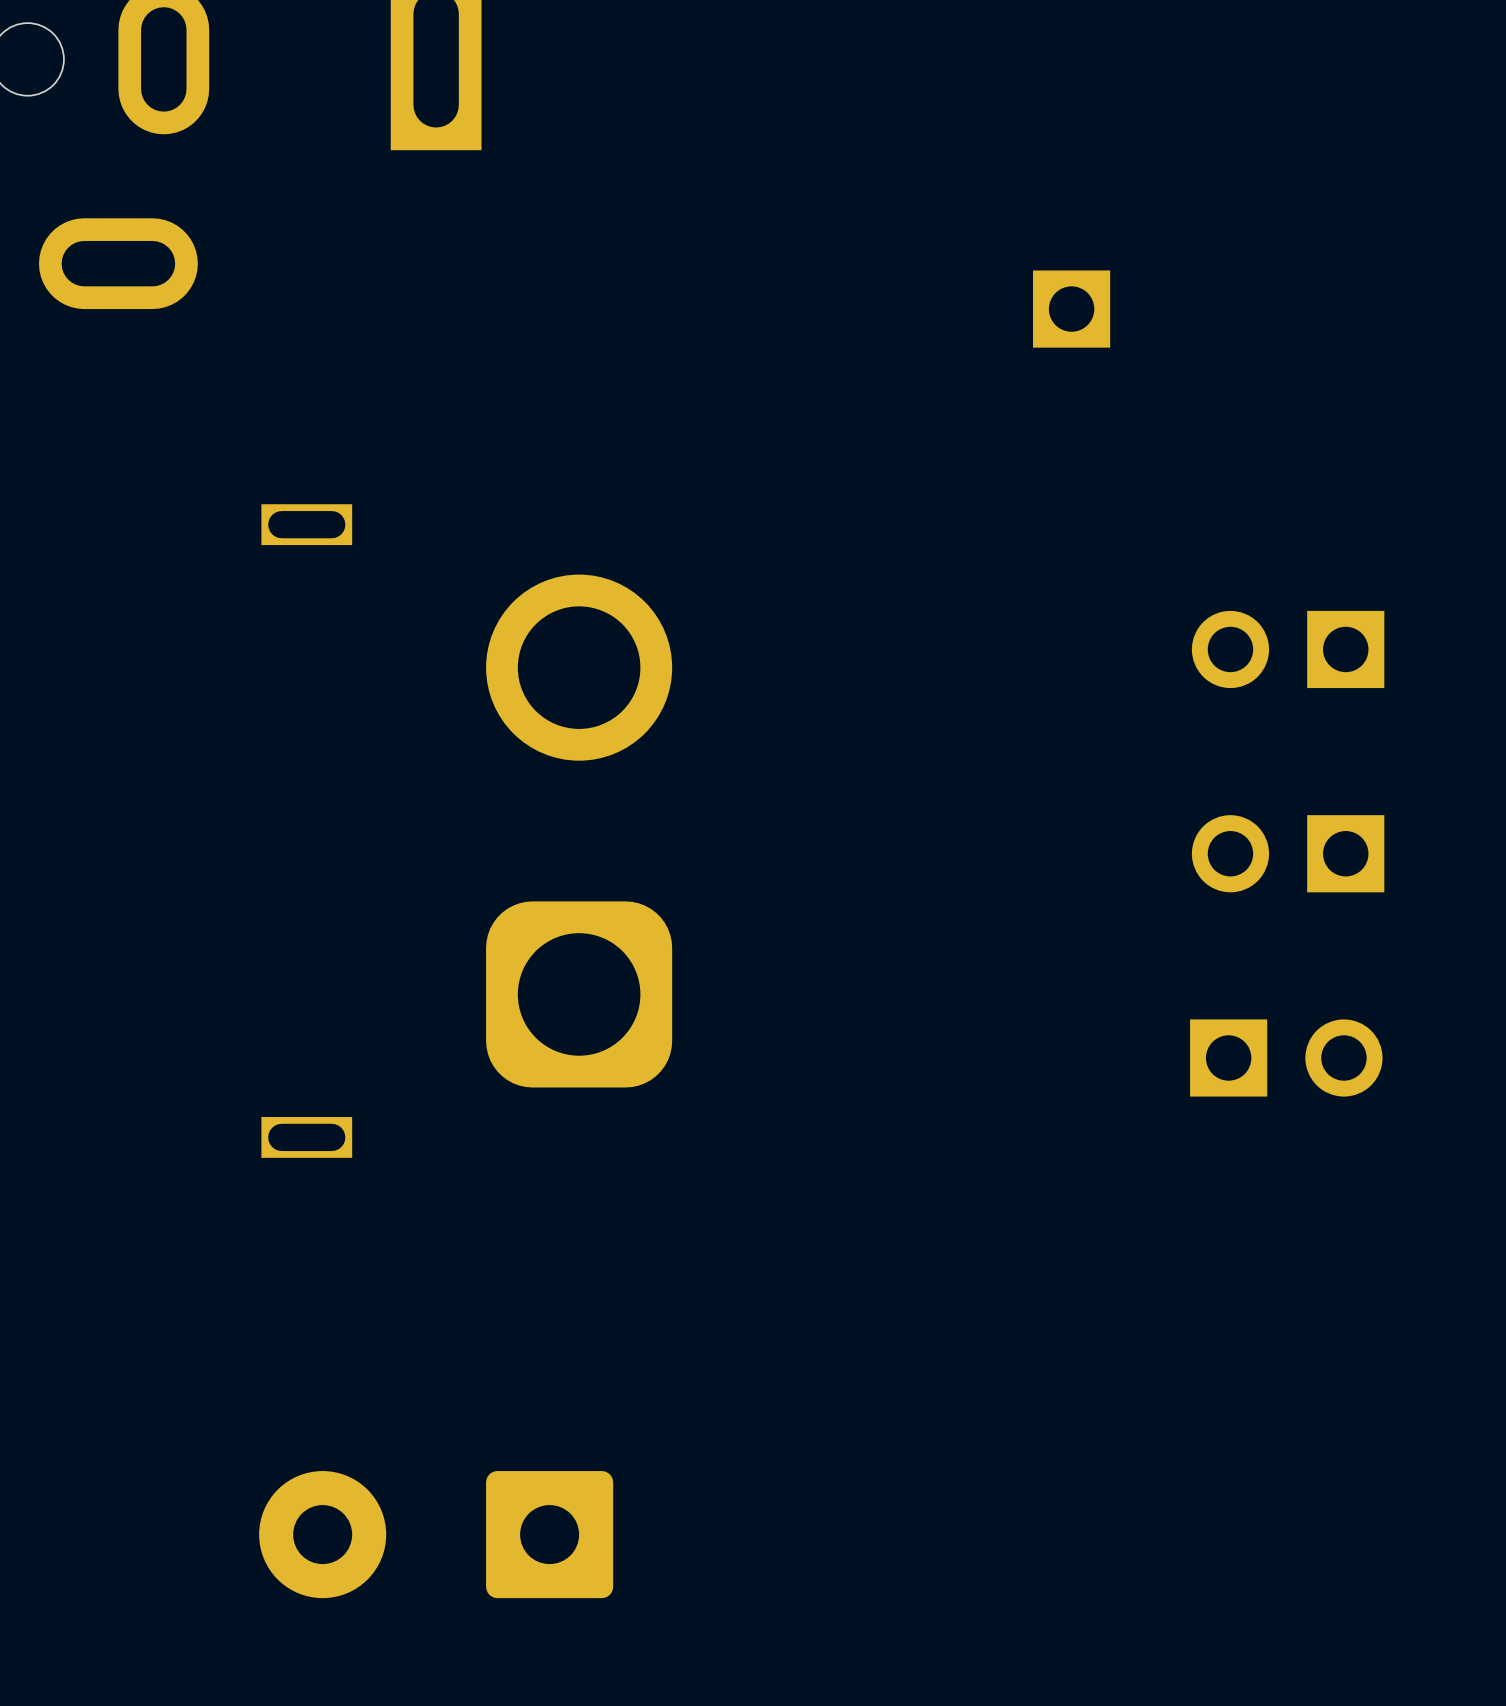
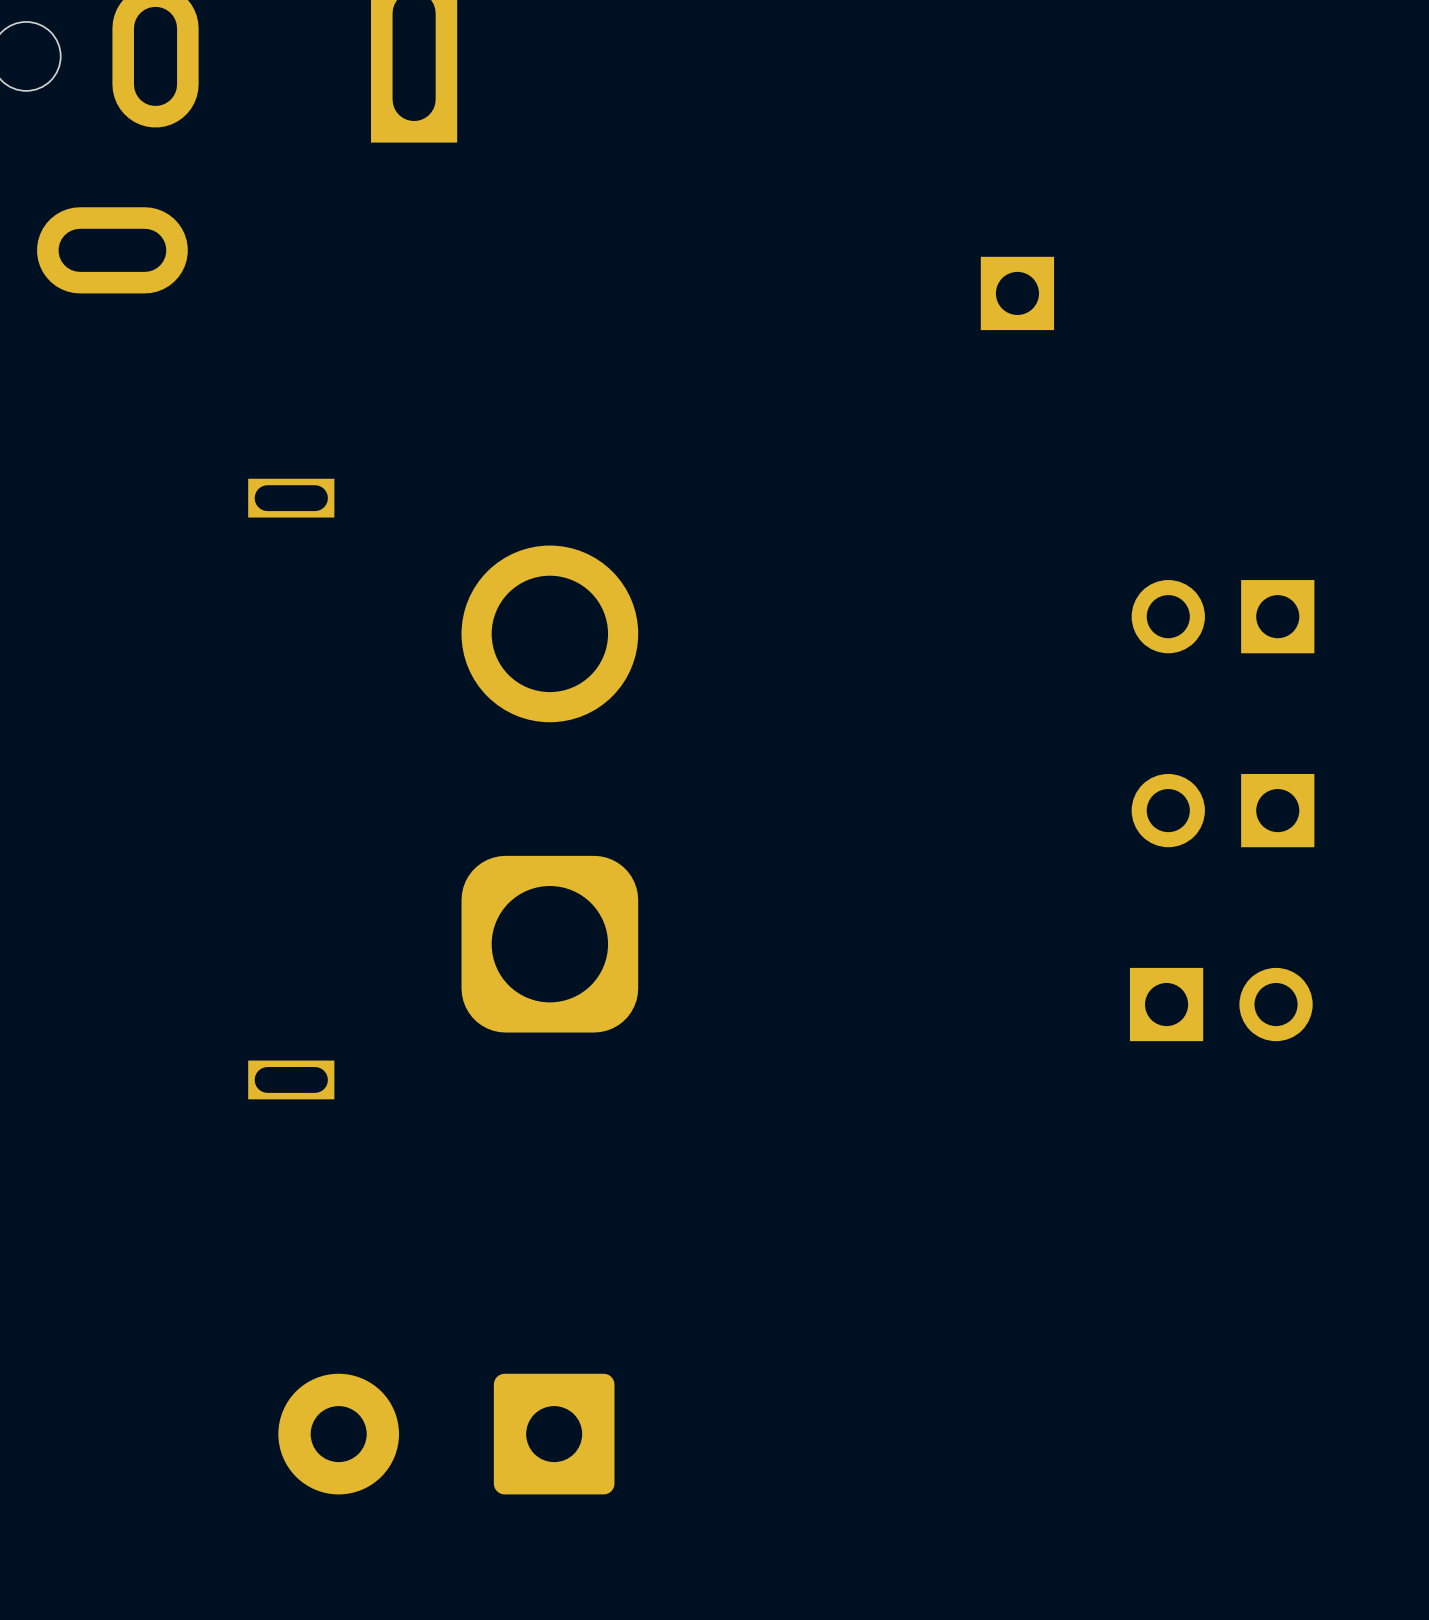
part position: (436, 1534) -> (446, 1434)

